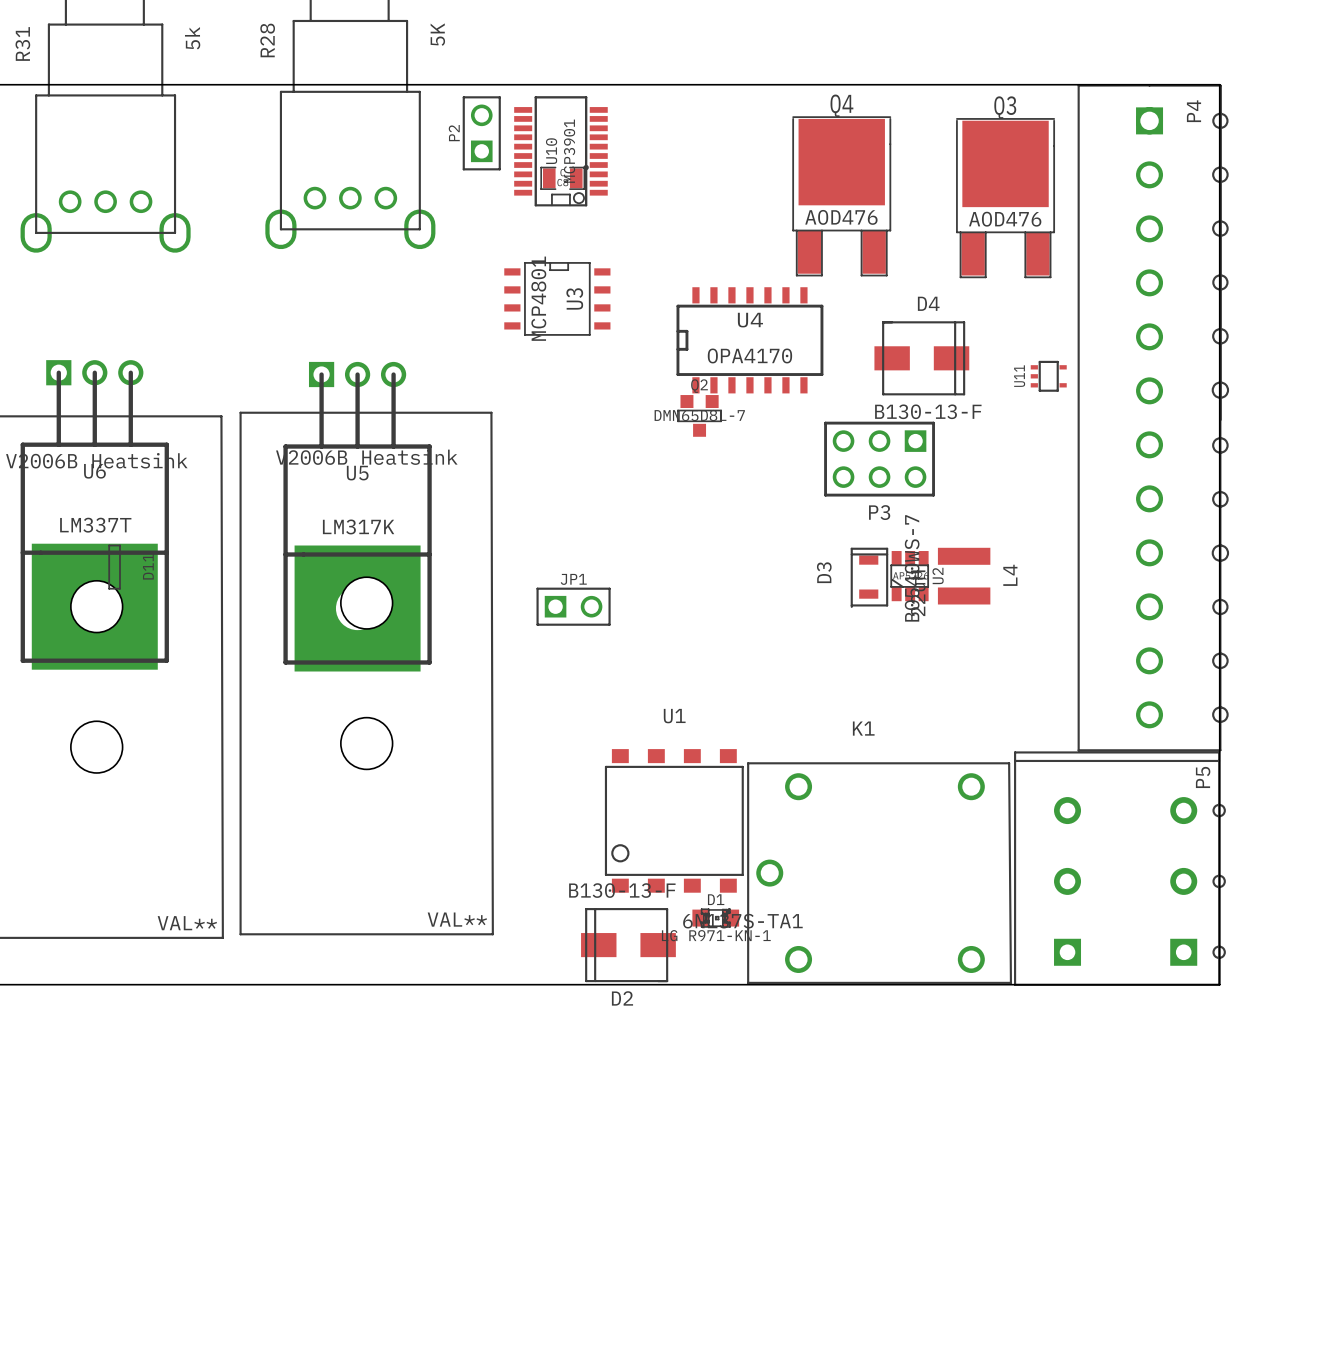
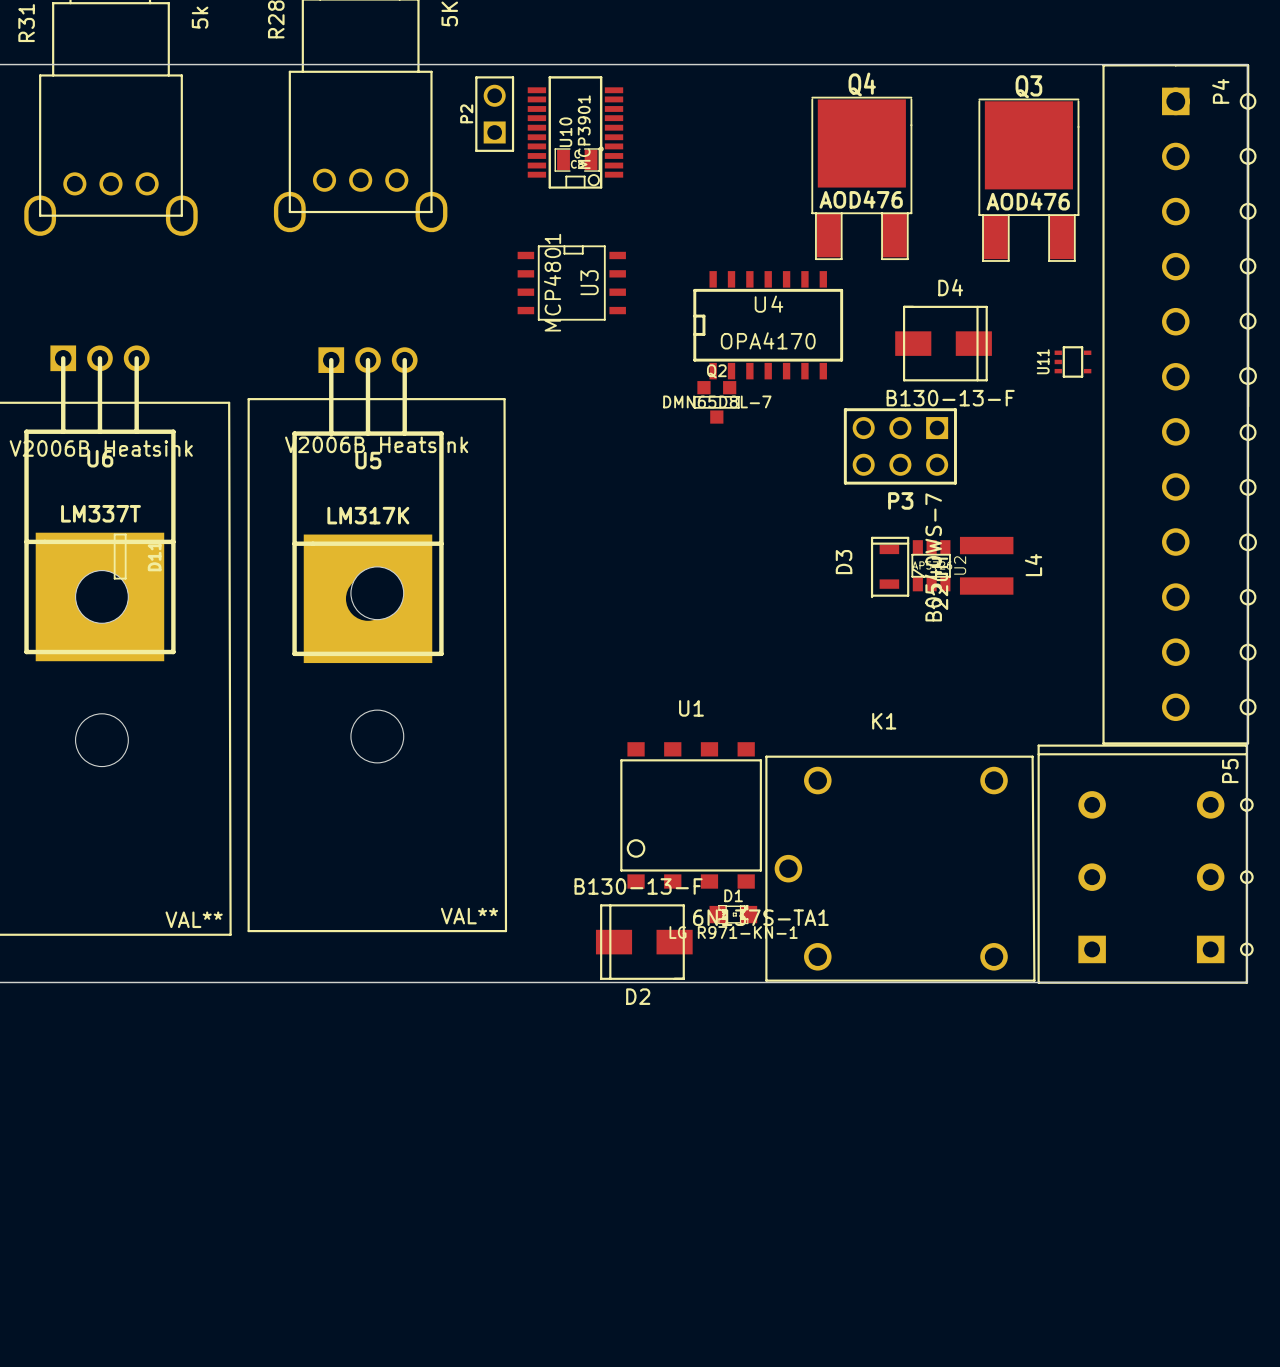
JP1: (573, 606) -> none

